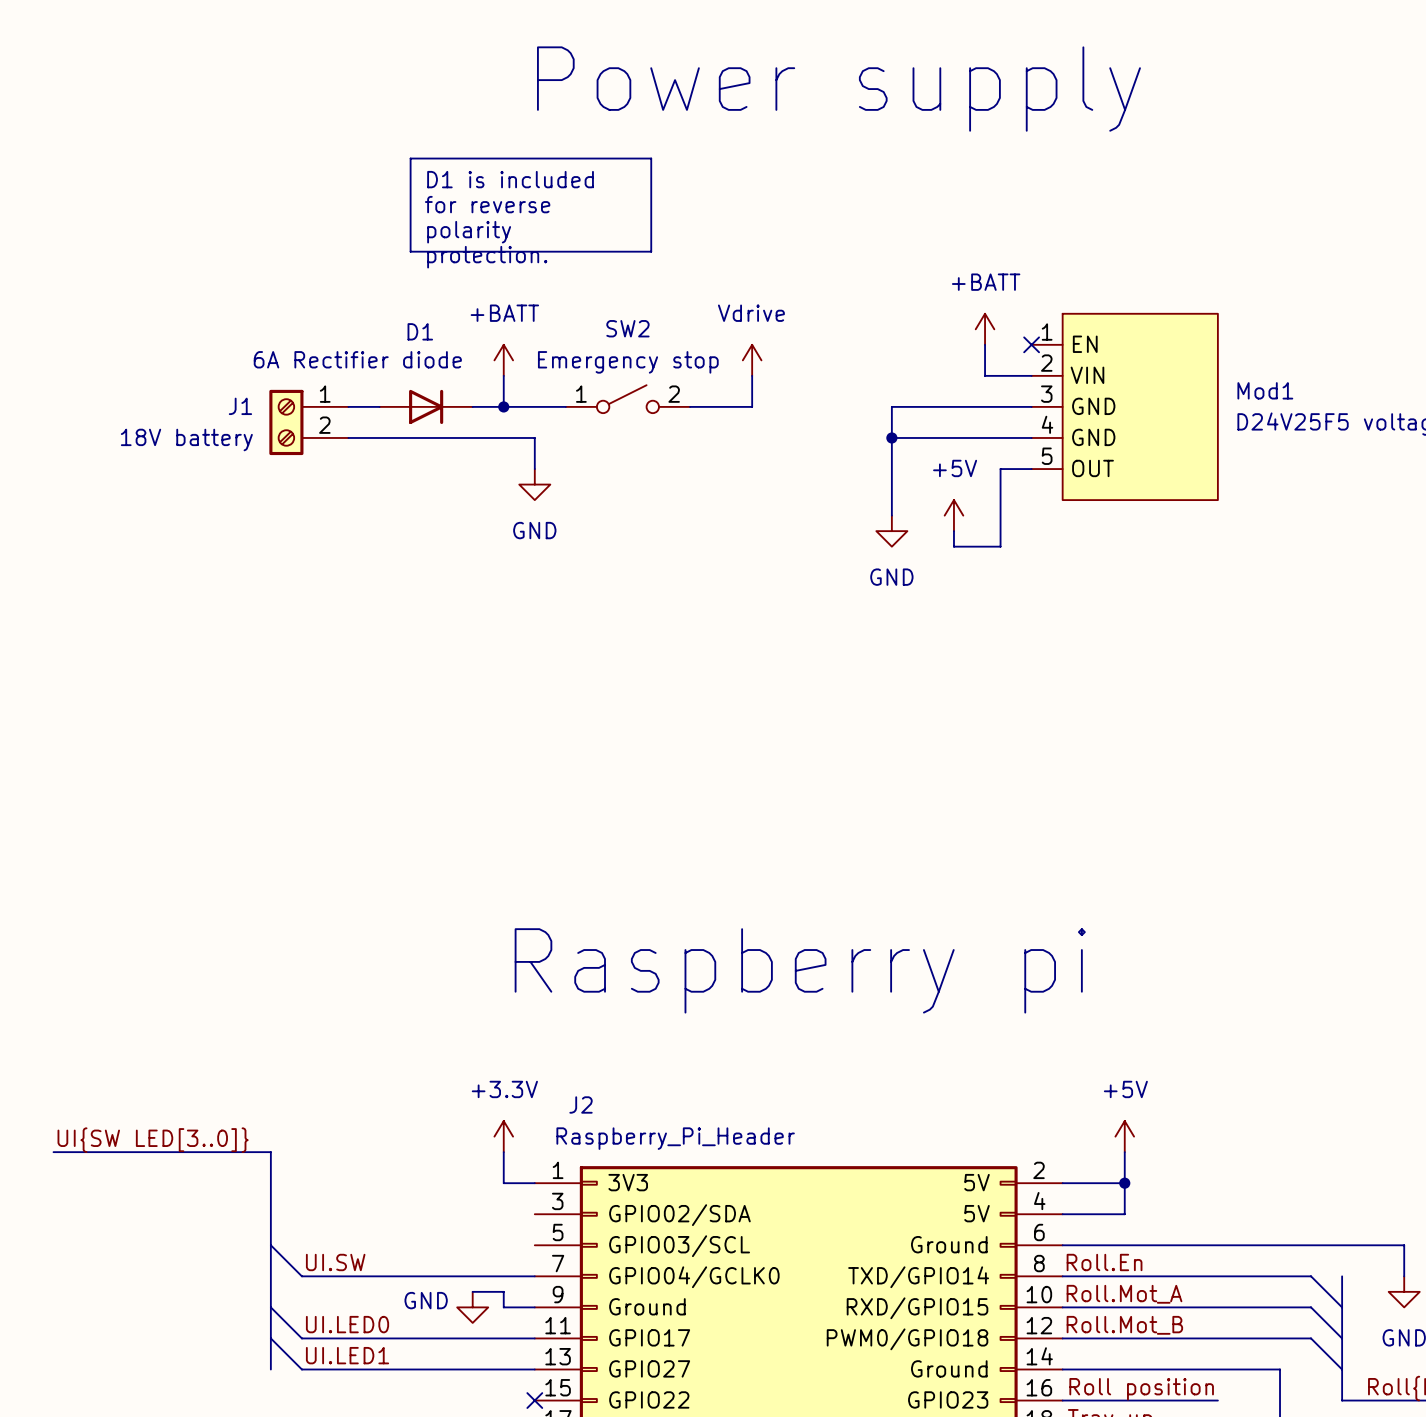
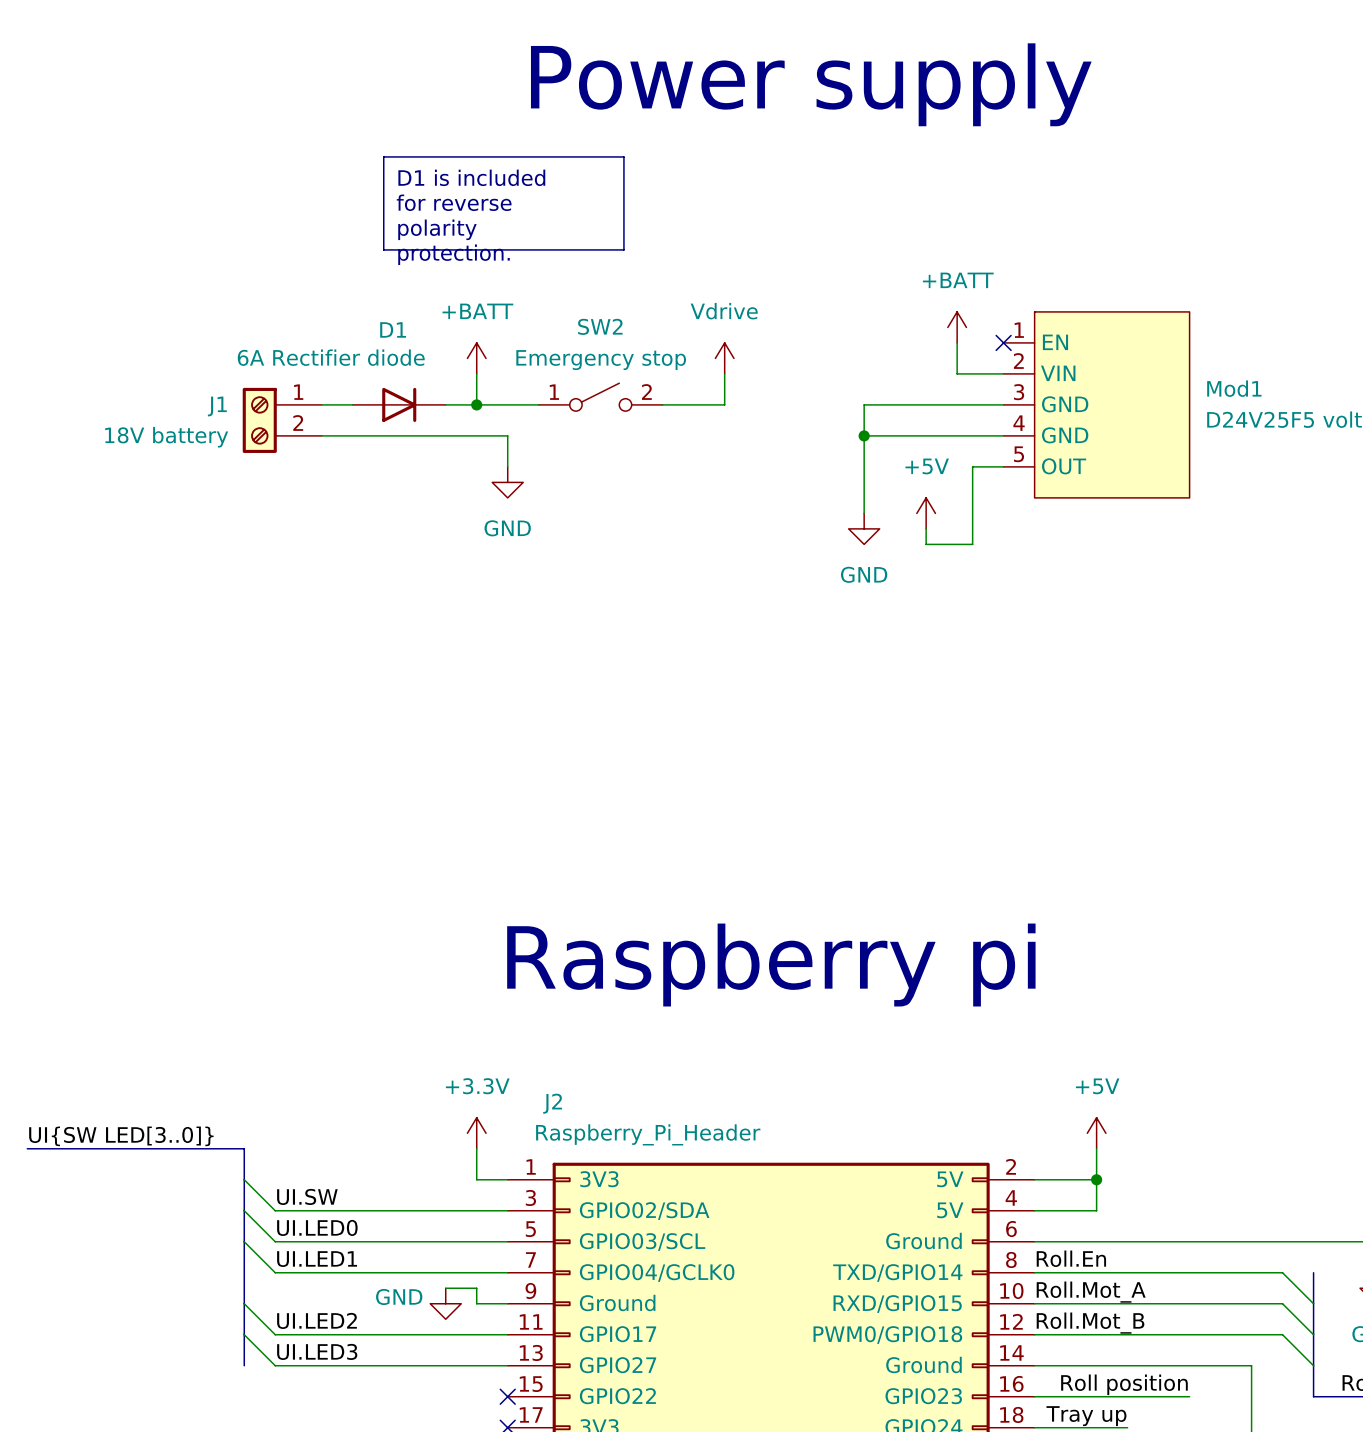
wire: none -> (244, 1179) (275, 1210) (507, 1210)
label: none -> UI.SW (307, 1196)
wire: none -> (244, 1210) (275, 1241) (507, 1241)
label: none -> UI.LED0 (317, 1227)
label: UI.SW (335, 1262) -> UI.LED1 (317, 1259)
label: UI.LED0 (347, 1324) -> UI.LED2 (317, 1320)
label: UI.LED1 (347, 1355) -> UI.LED3 (317, 1351)

